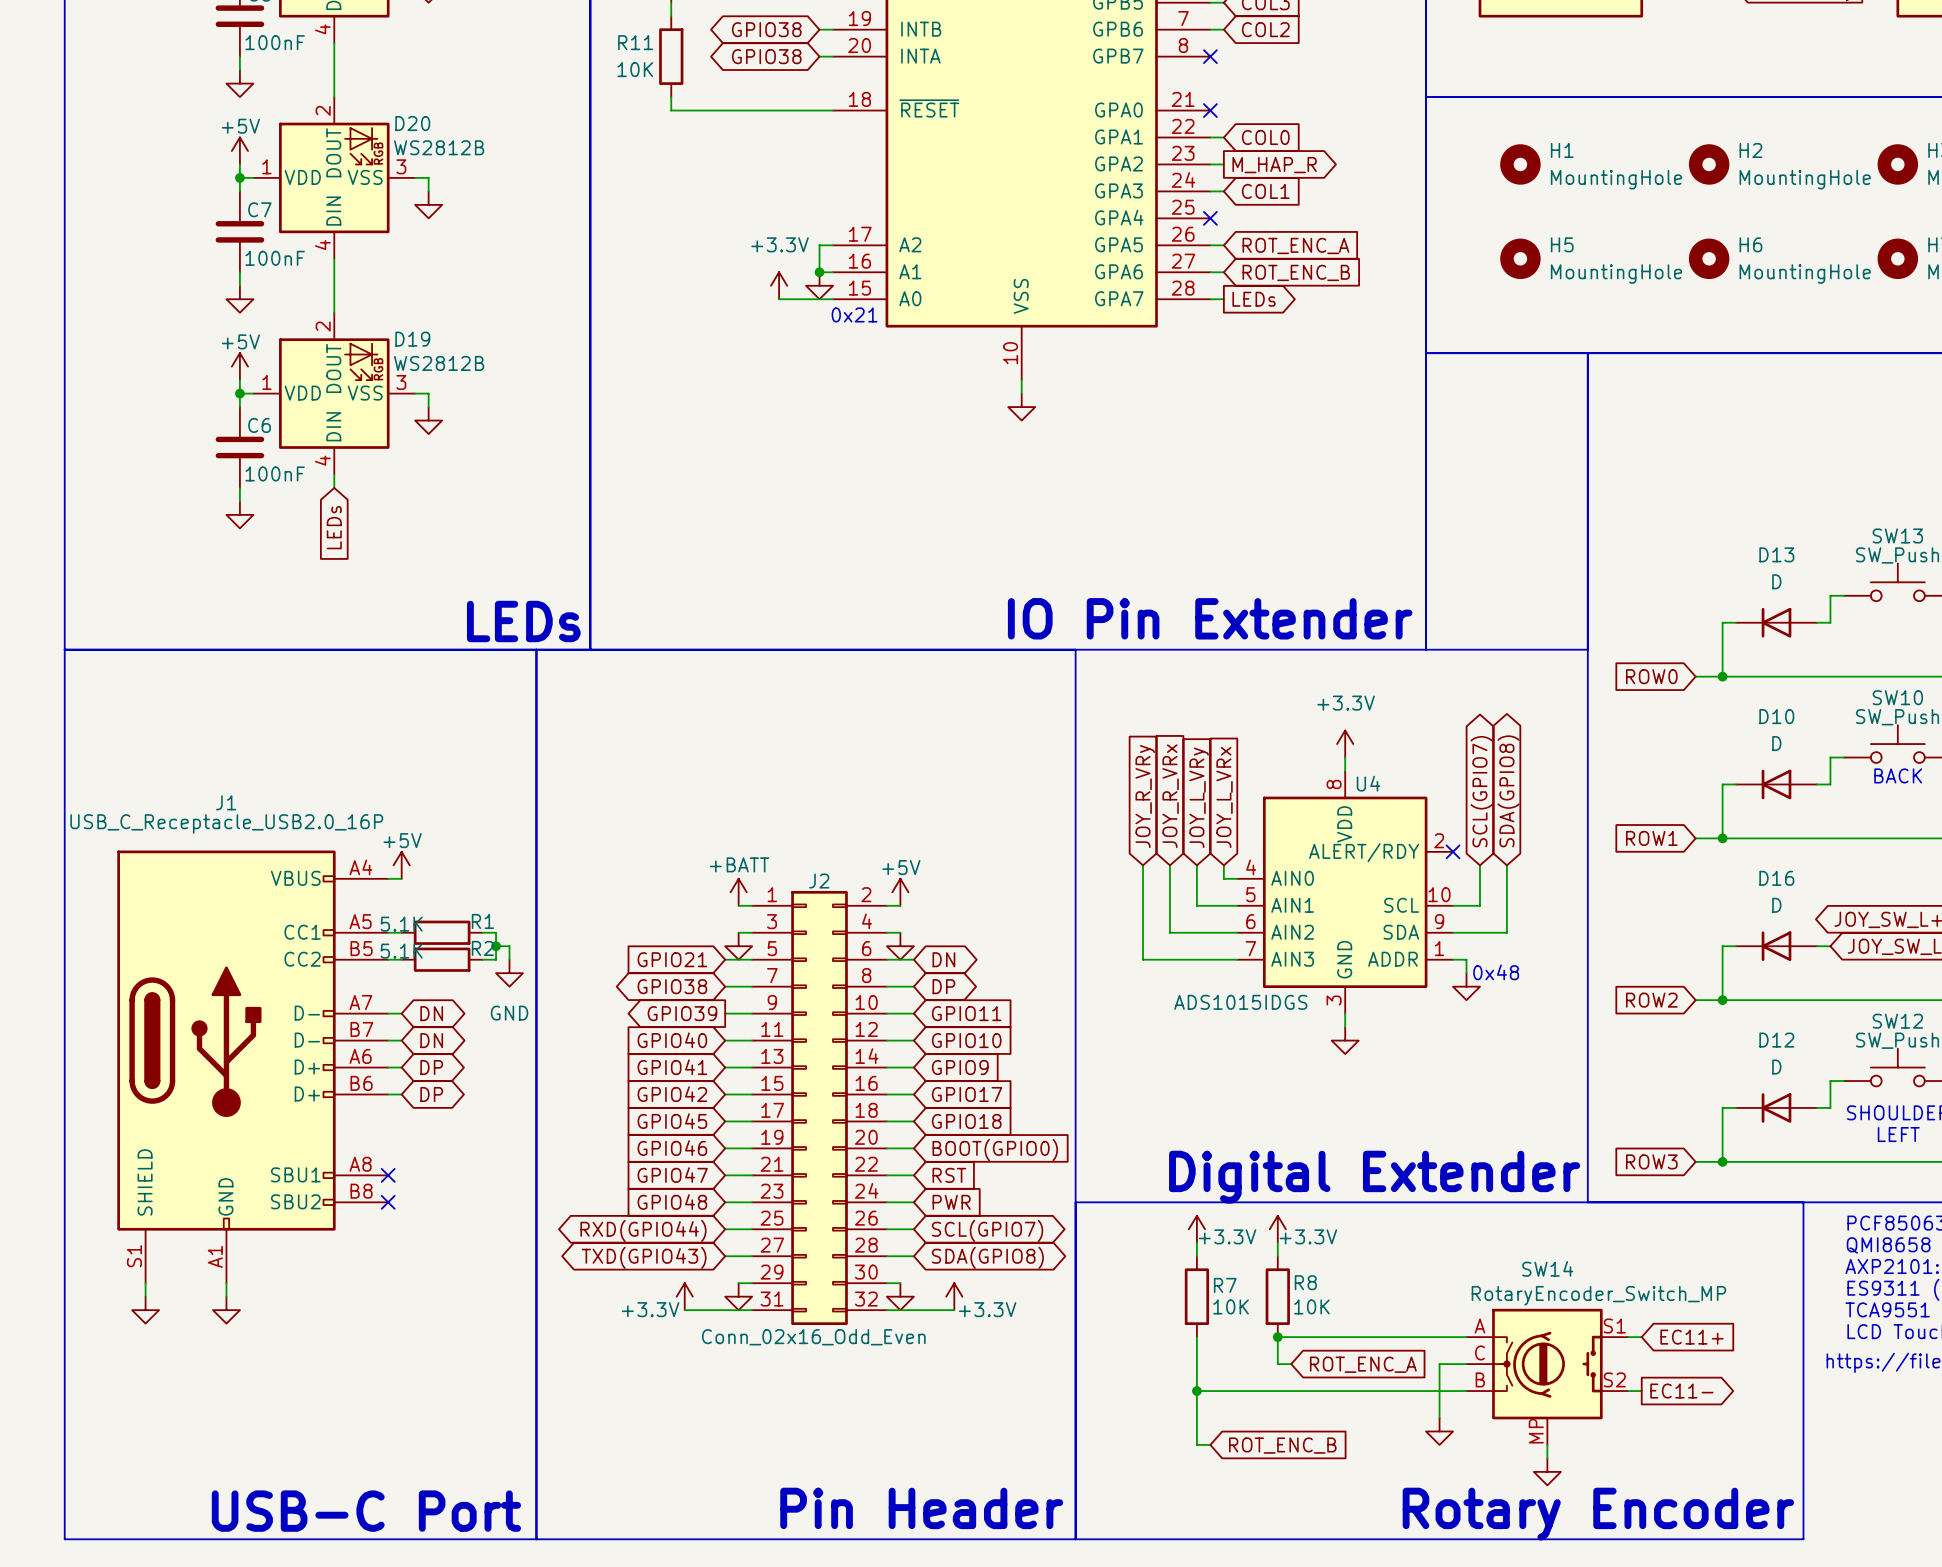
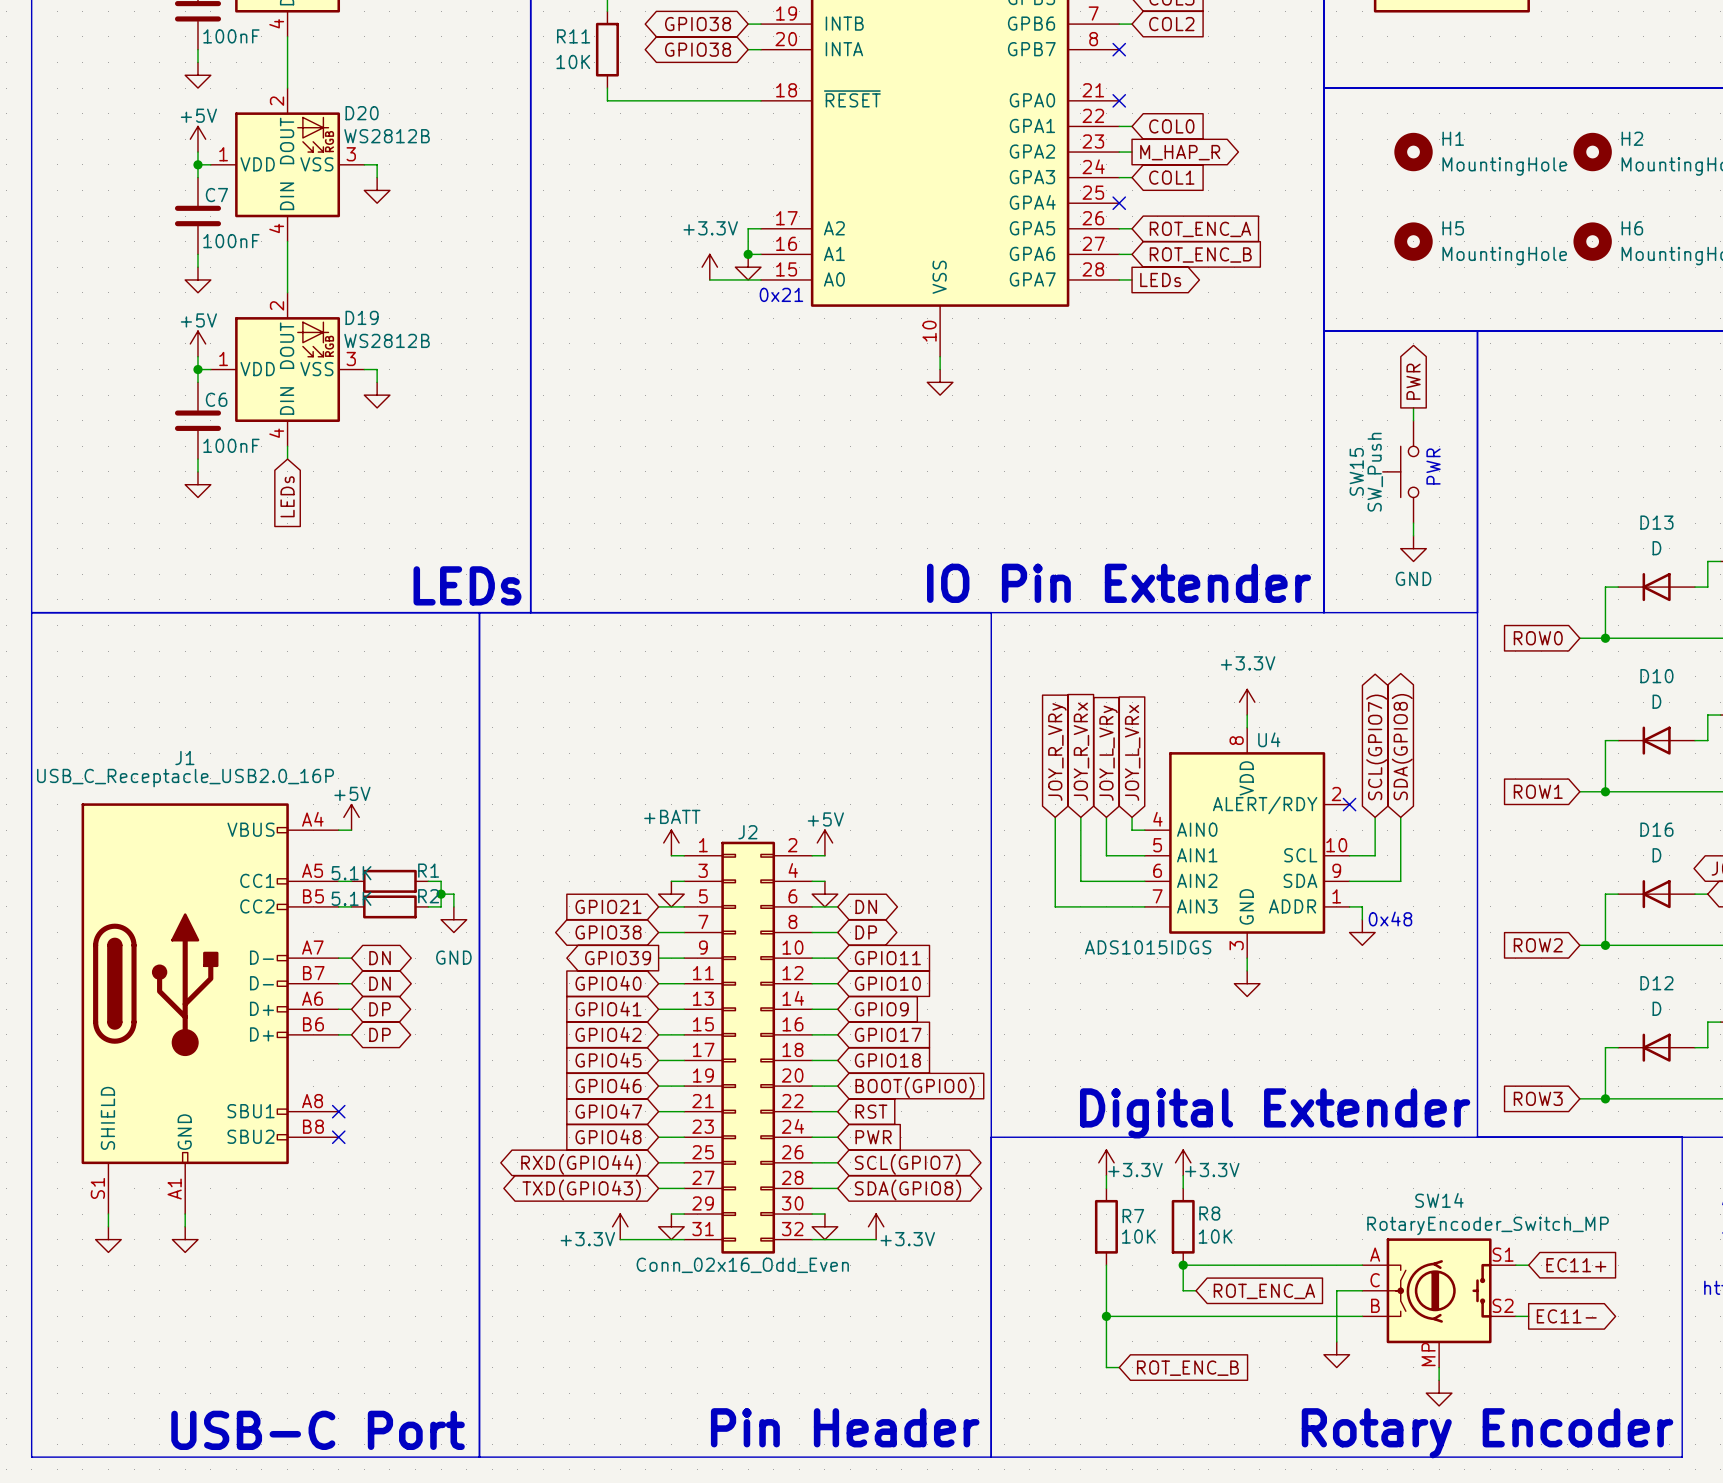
global label: none -> PWR (1413, 381)
wire: none -> (1413, 407) (1413, 420)
text: none -> PWR (1433, 466)
SW15: none -> SW_Push (1400, 471)
wire: none -> (1413, 523) (1413, 535)
power symbol: none -> GND (1413, 548)

